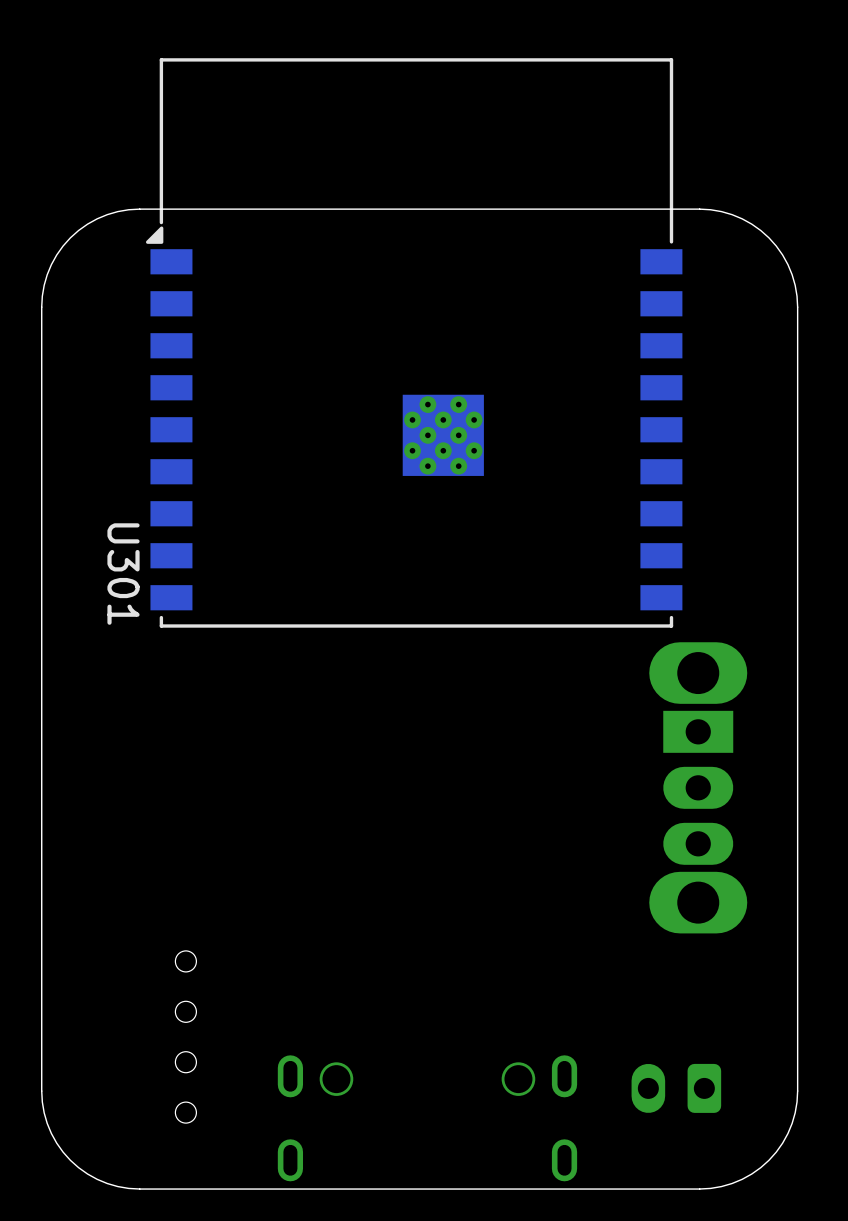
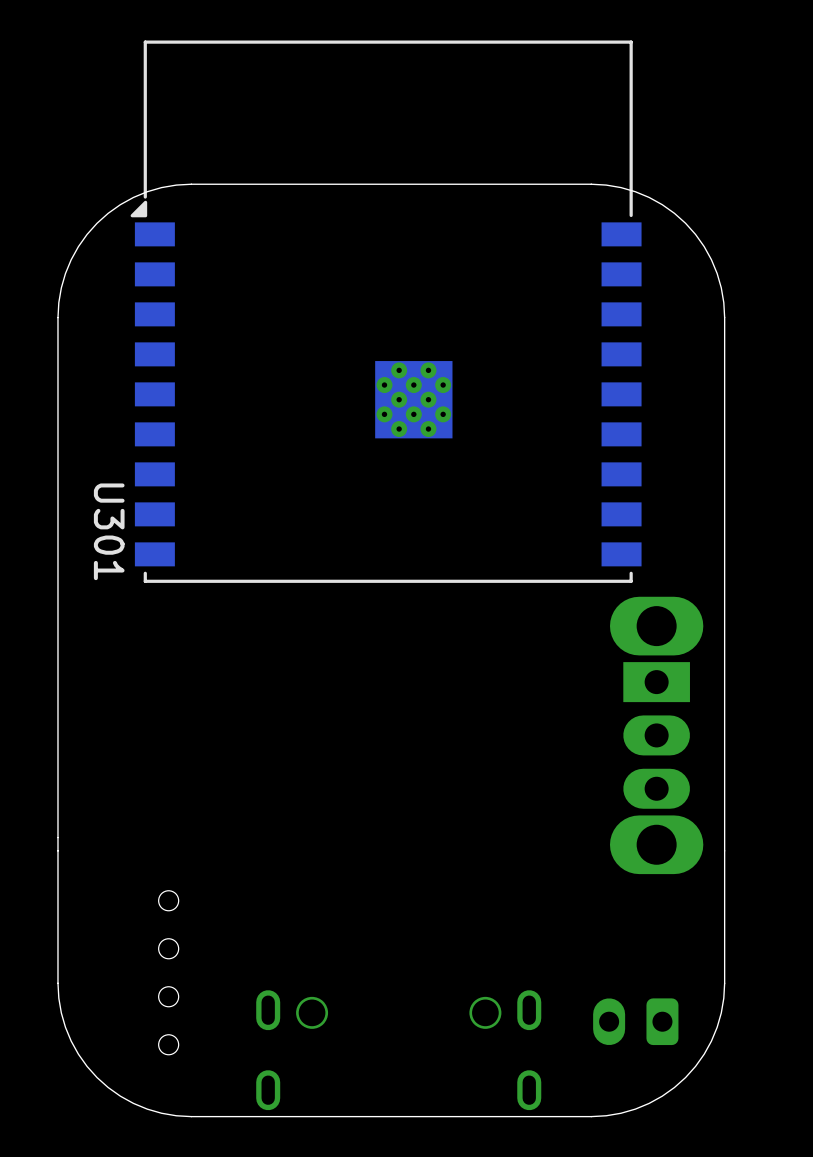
drawing shape: [41, 208, 799, 1190] -> [57, 183, 726, 1118]

